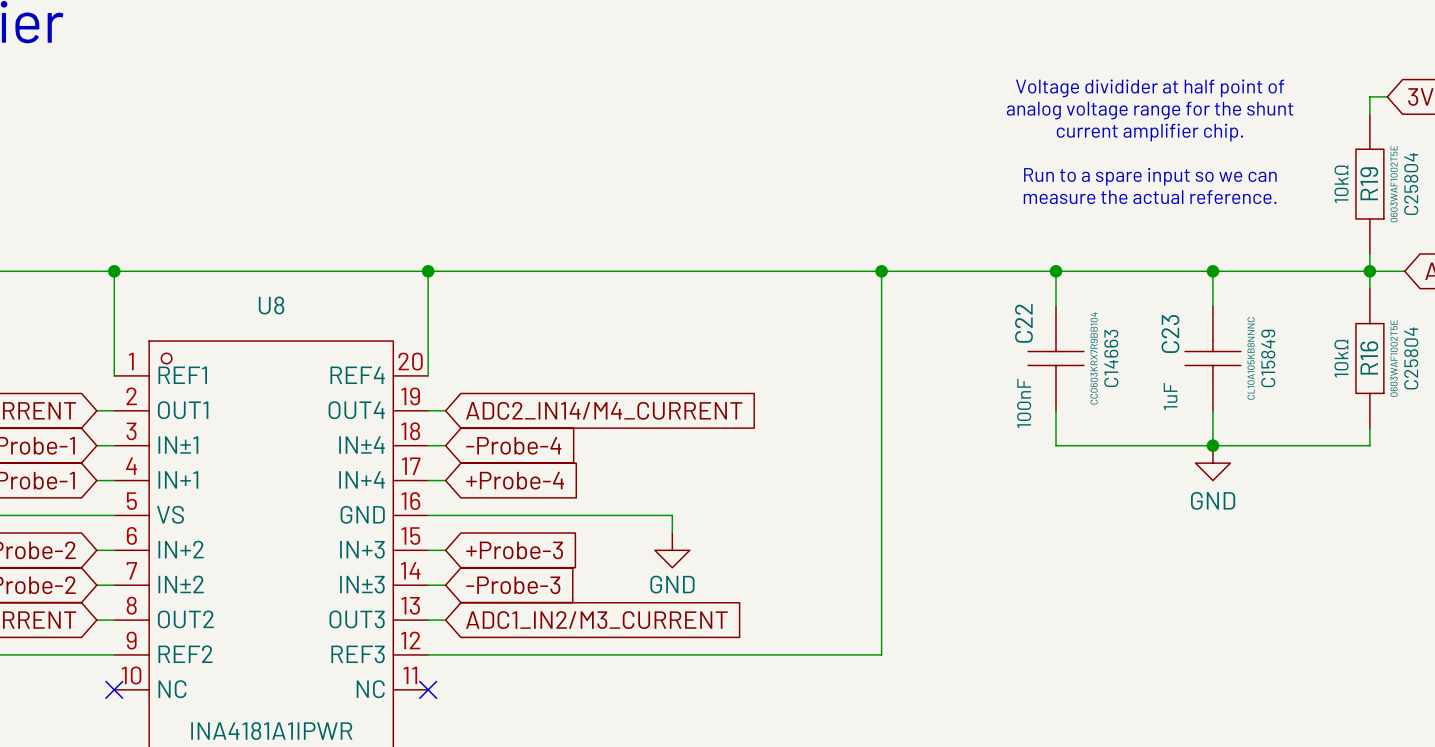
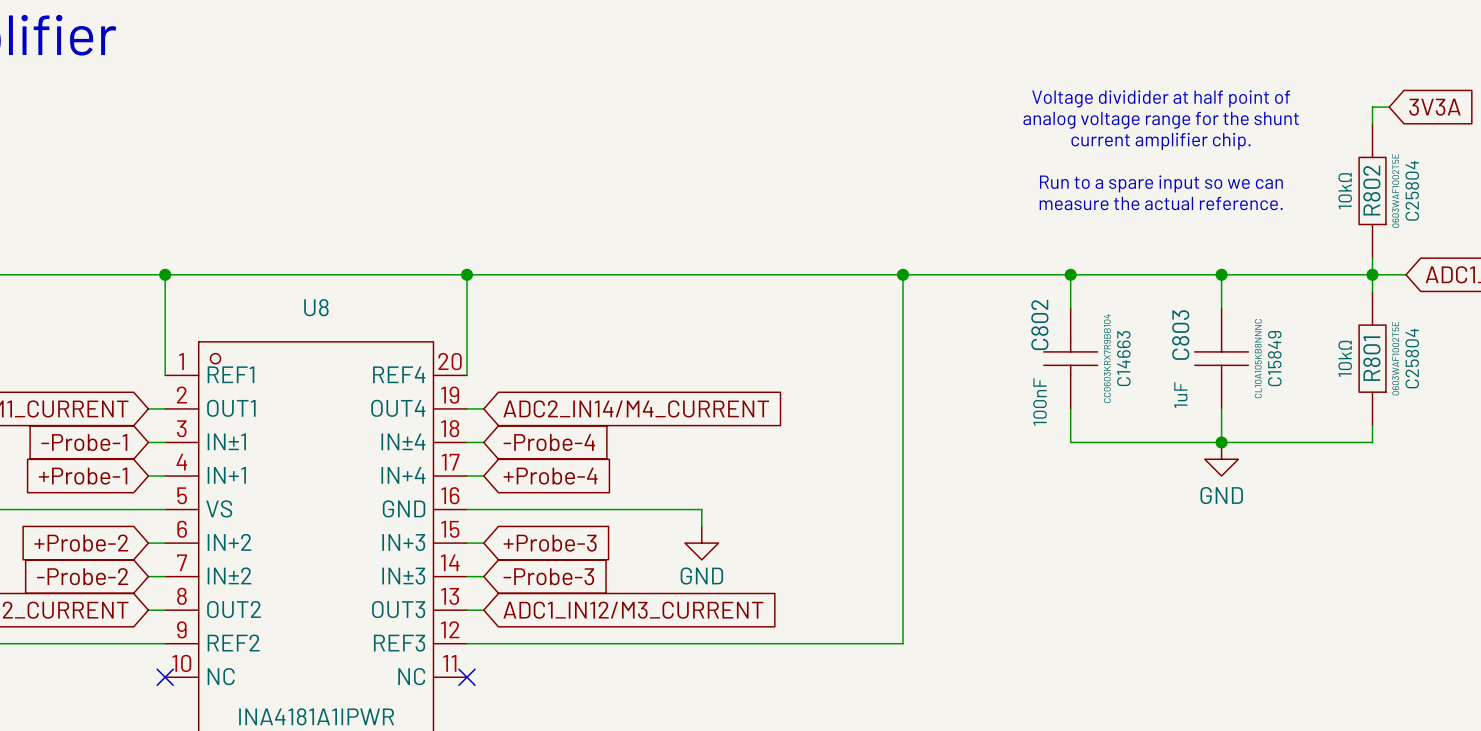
R19 name: R19 (1369, 183) -> R802 (1371, 190)
C22 name: C22 (1023, 323) -> C802 (1039, 324)
C23 name: C23 (1170, 333) -> C803 (1180, 335)
R16 name: R16 (1369, 357) -> R801 (1371, 358)
global label: ADC1_IN2/M3_CURRENT (596, 620) -> ADC1_IN12/M3_CURRENT (633, 610)

